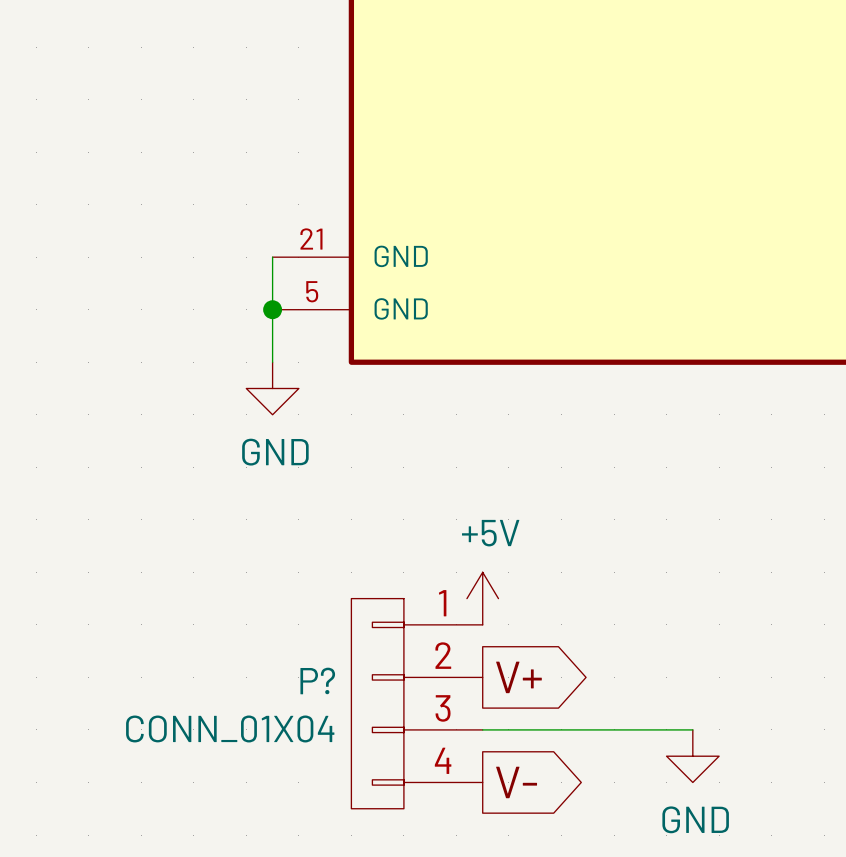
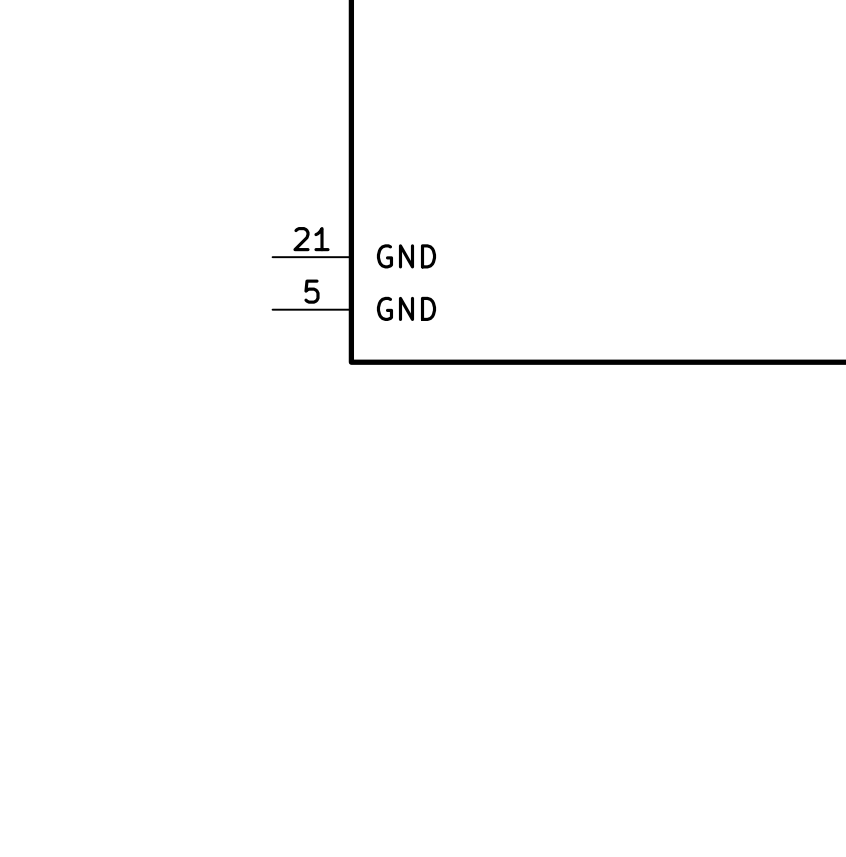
wire: (272, 257) (272, 362) -> none
junction: (272, 309) -> none
power symbol: GND (272, 388) -> none
power symbol: +5V (482, 598) -> none
global label: V+ (518, 677) -> none
P?: CONN_01X04 (417, 703) -> none
wire: (482, 729) (692, 729) -> none
power symbol: GND (692, 756) -> none
global label: V- (516, 782) -> none

